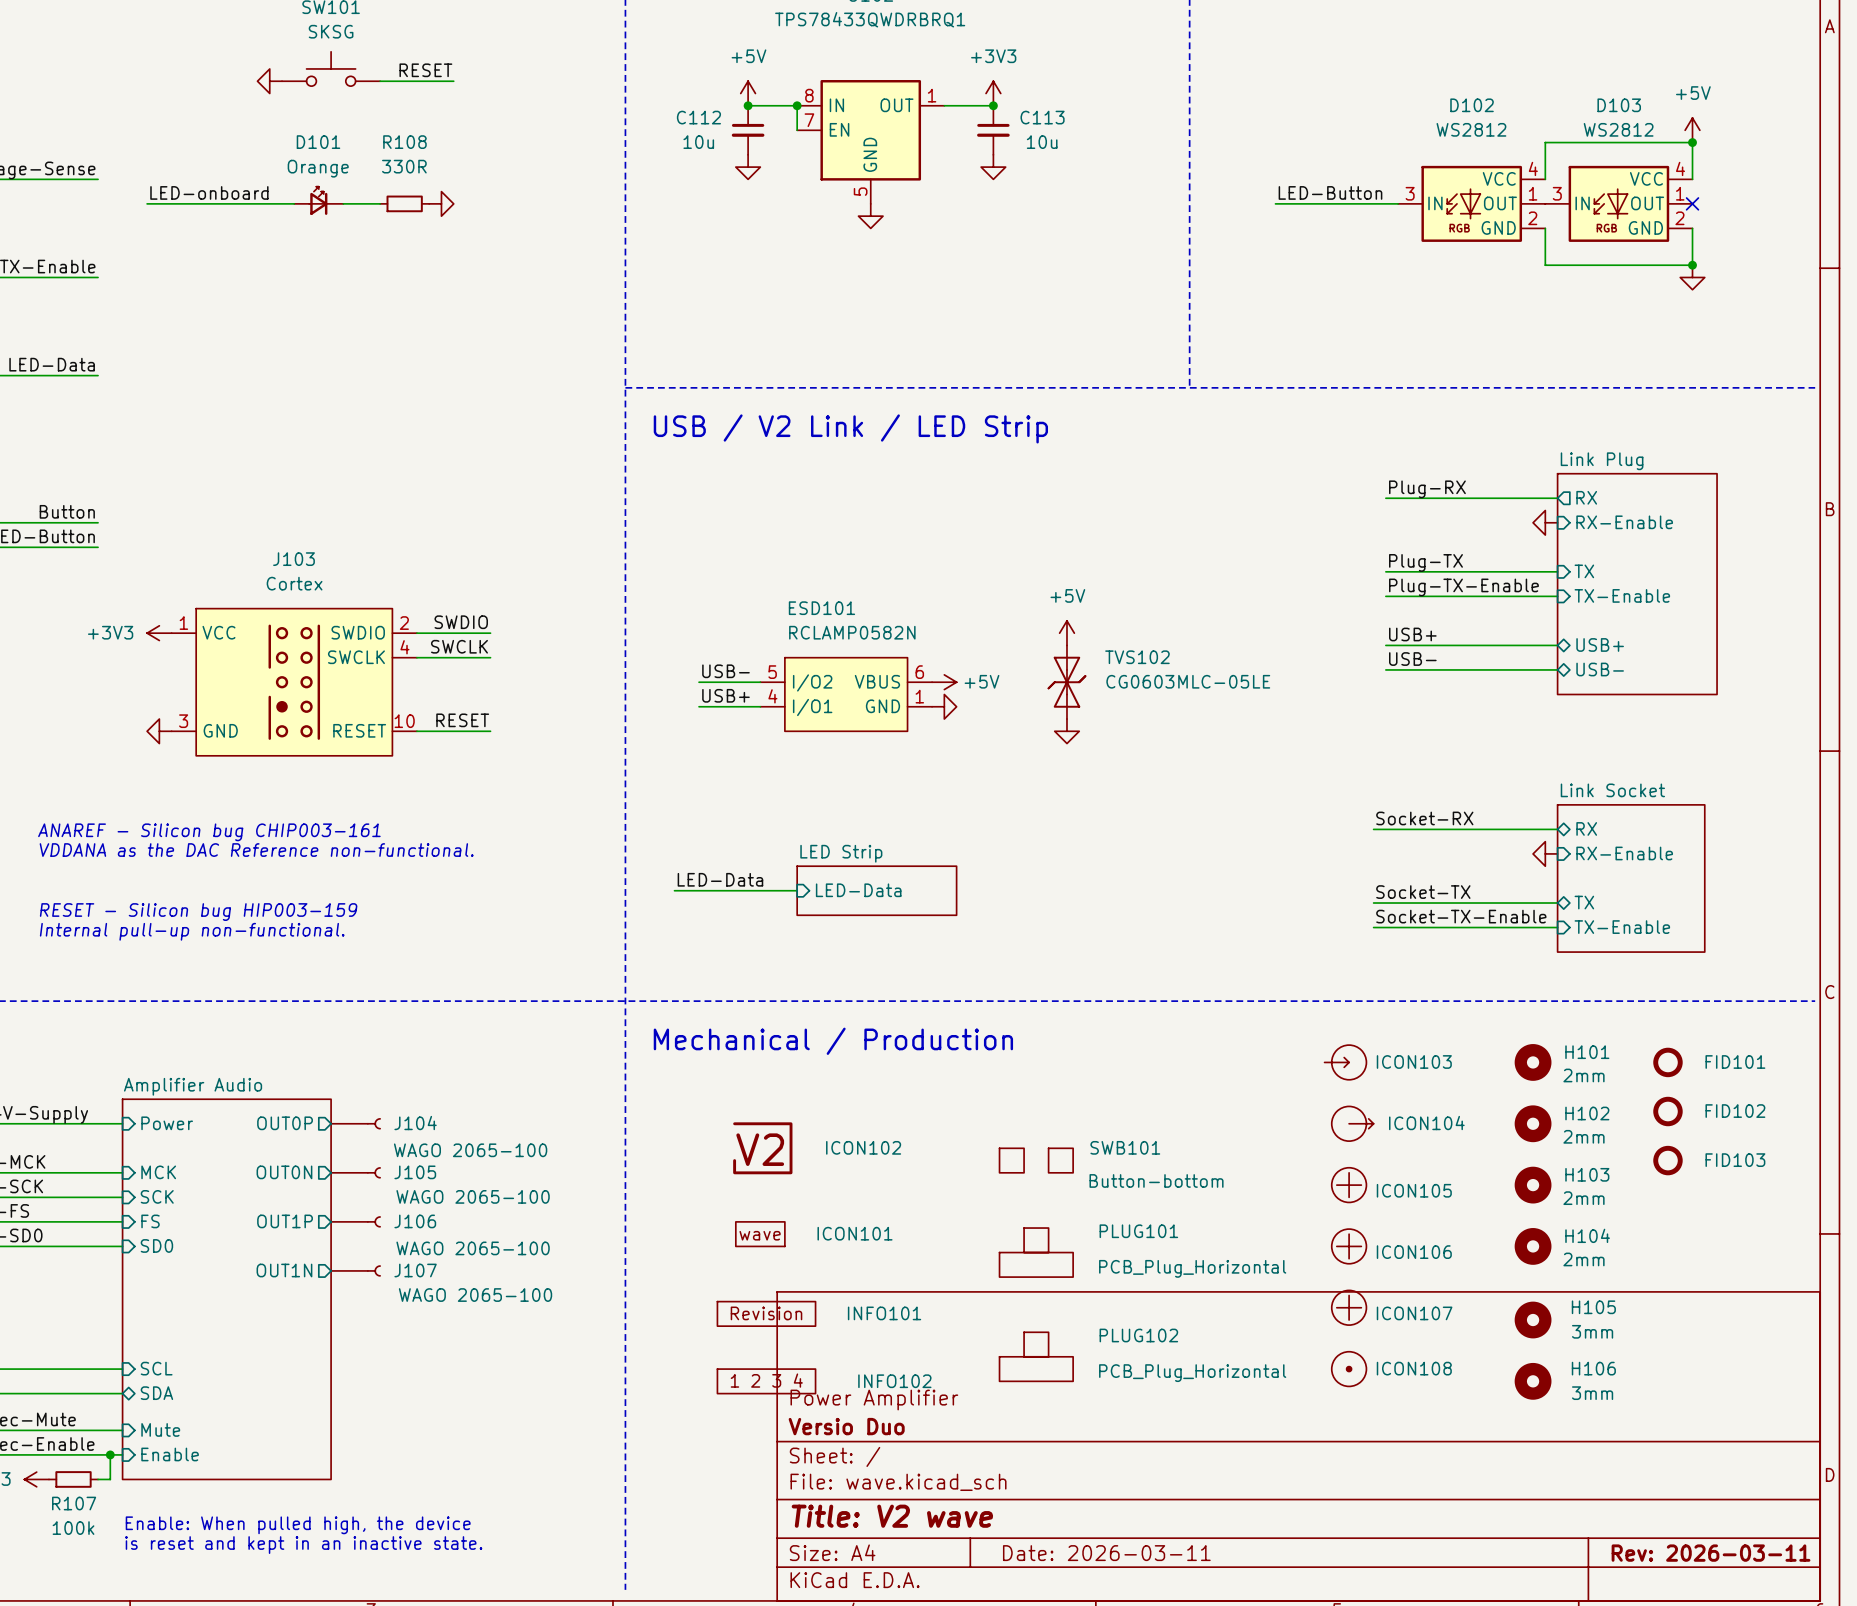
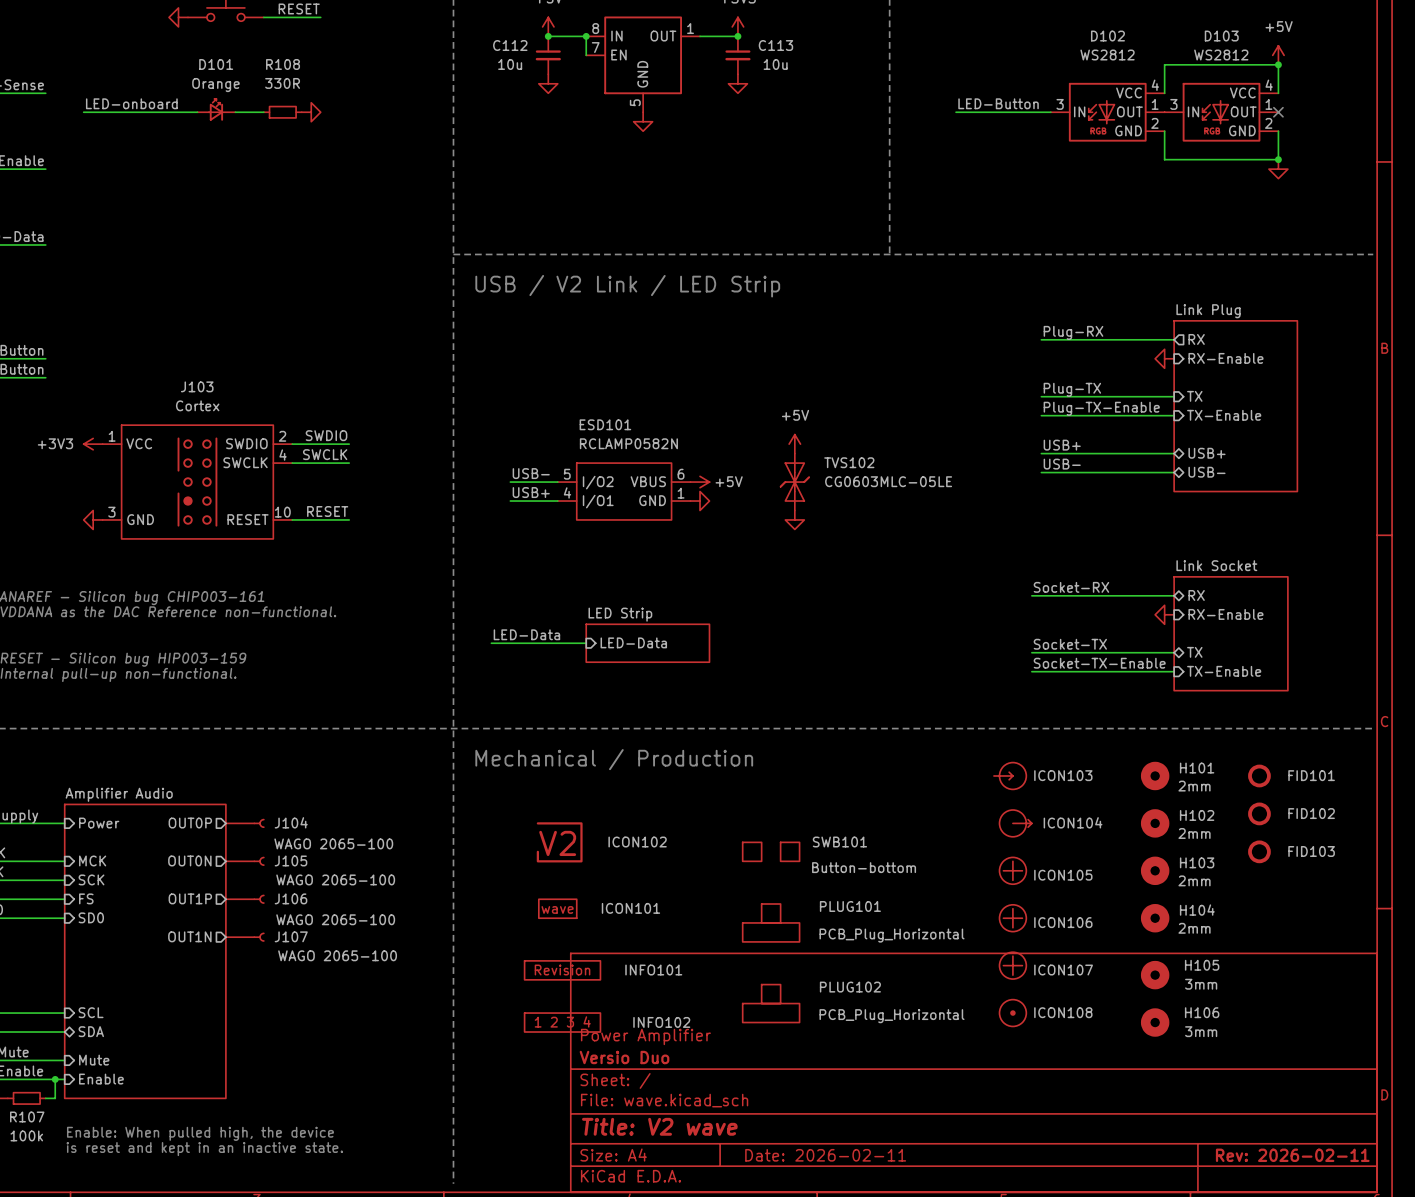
title block: Date: 2026-03-11 (1106, 1553) -> Date: 2026-02-11 (825, 1155)
title block: Rev: 2026-03-11 (1711, 1553) -> Rev: 2026-02-11 (1292, 1155)

